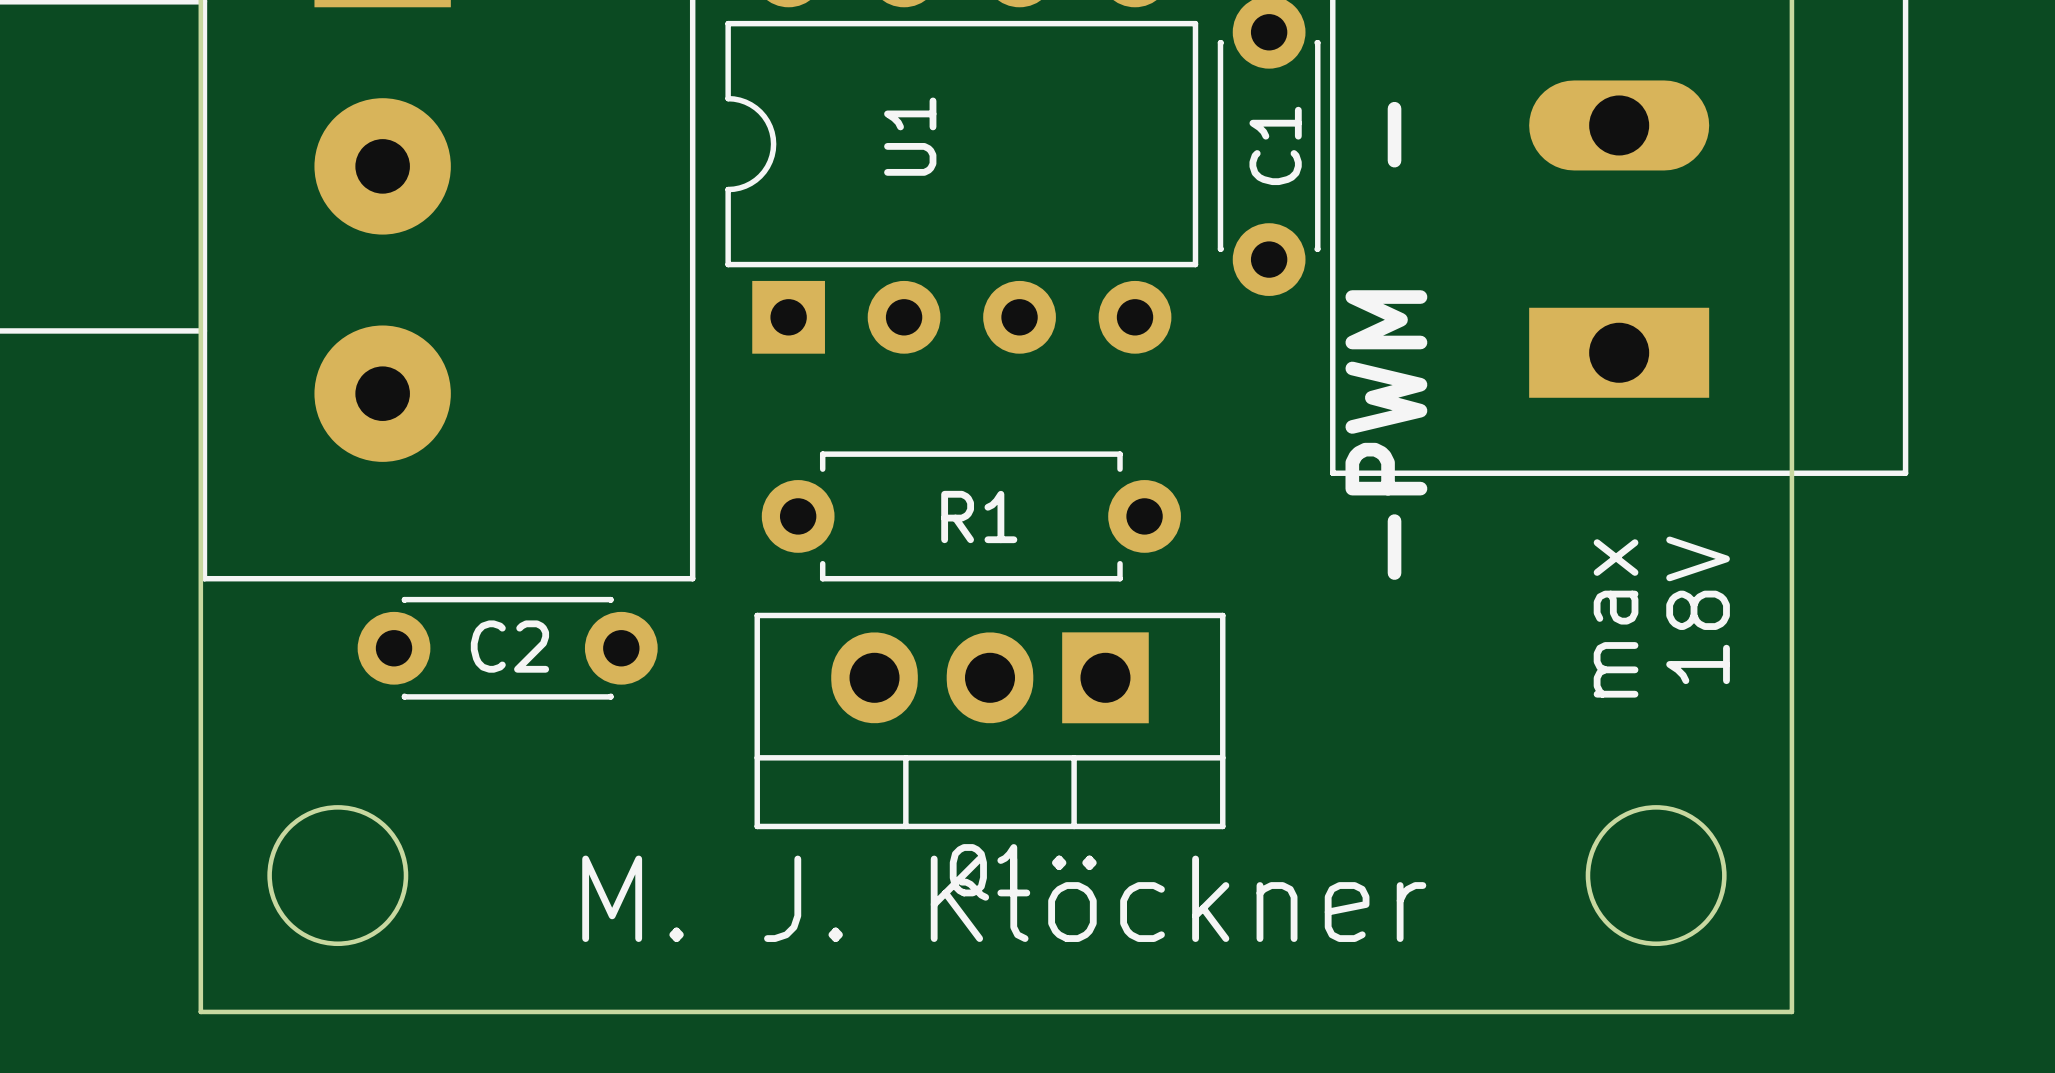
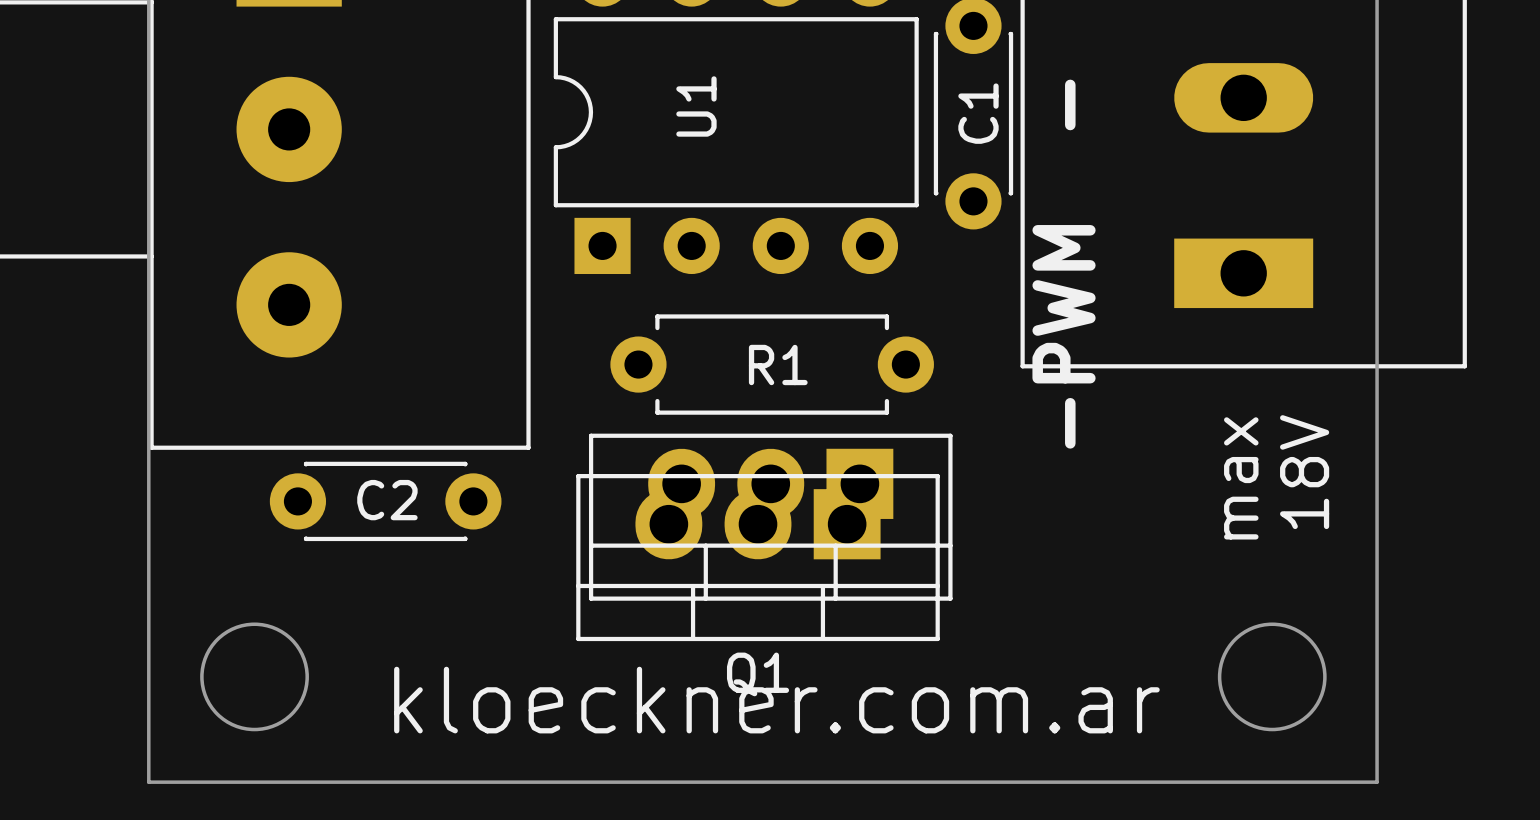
R1 position: (971, 516) -> (772, 364)
part: none -> (770, 517)
text: M. J. Klöckner (1004, 898) -> none
text: none -> kloeckner.com.ar (776, 700)

